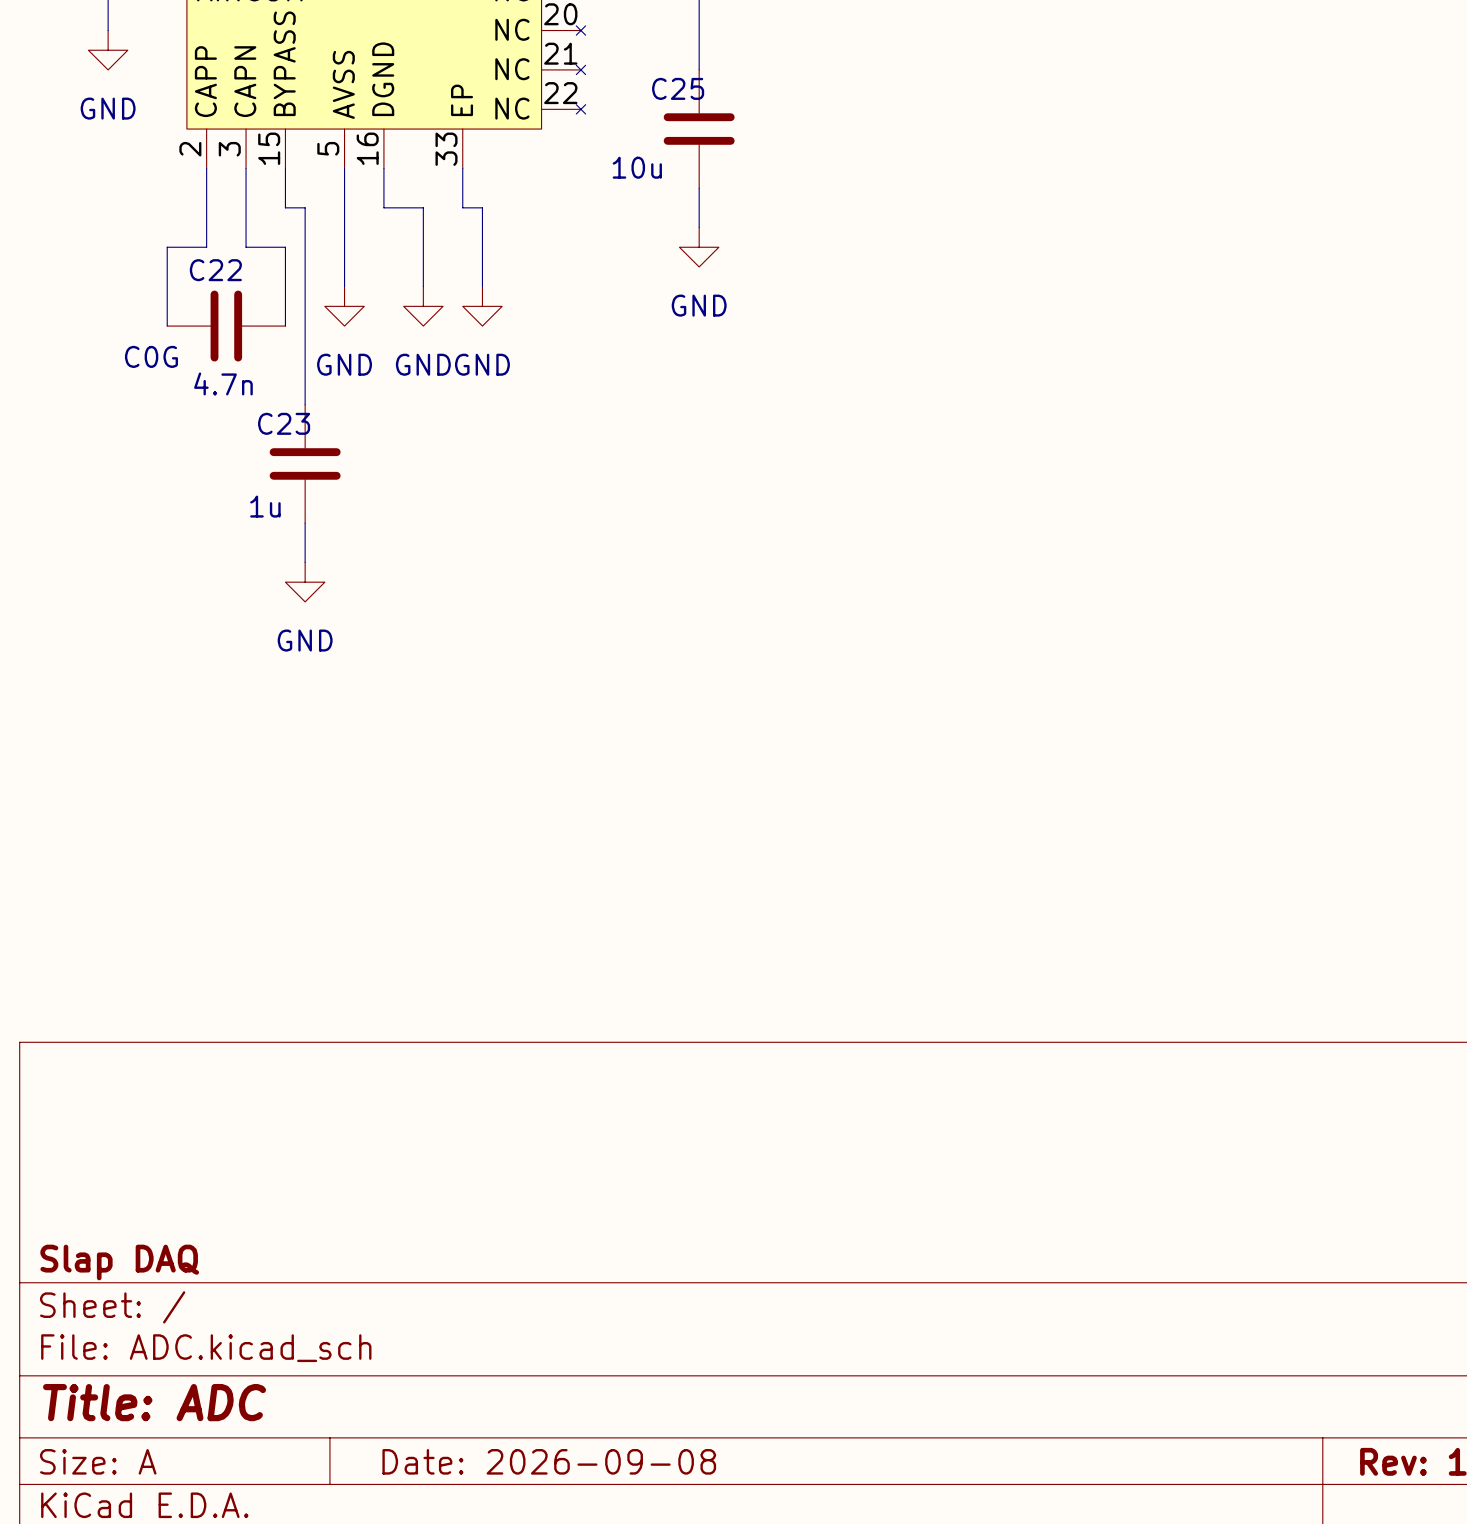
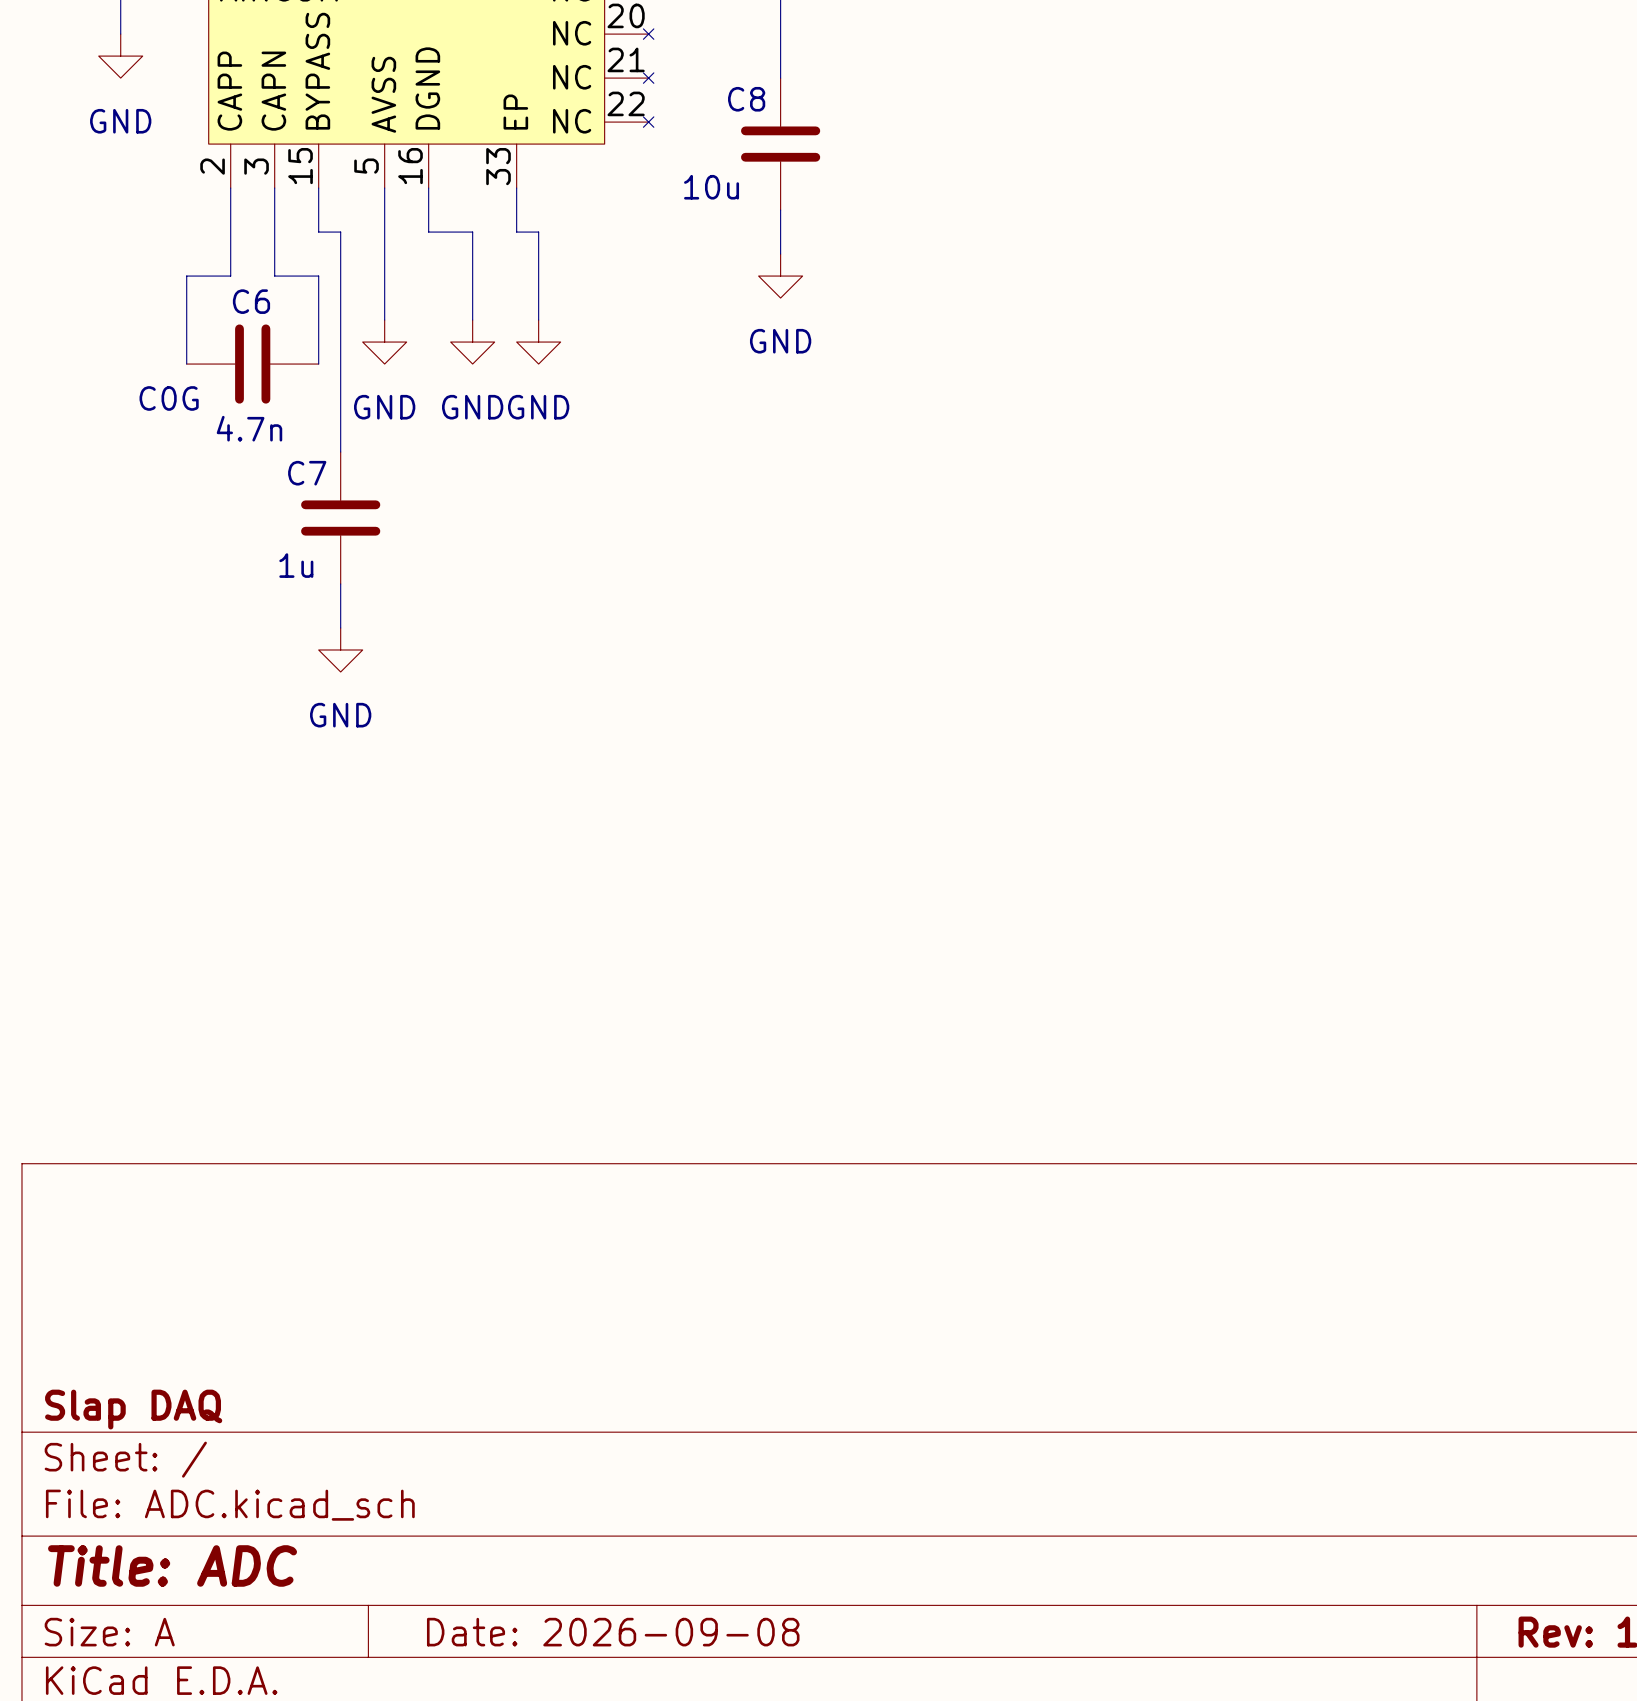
C25 name: C25 (678, 88) -> C8 (746, 99)
C22 name: C22 (215, 270) -> C6 (251, 301)
C23 name: C23 (284, 423) -> C7 (307, 473)

